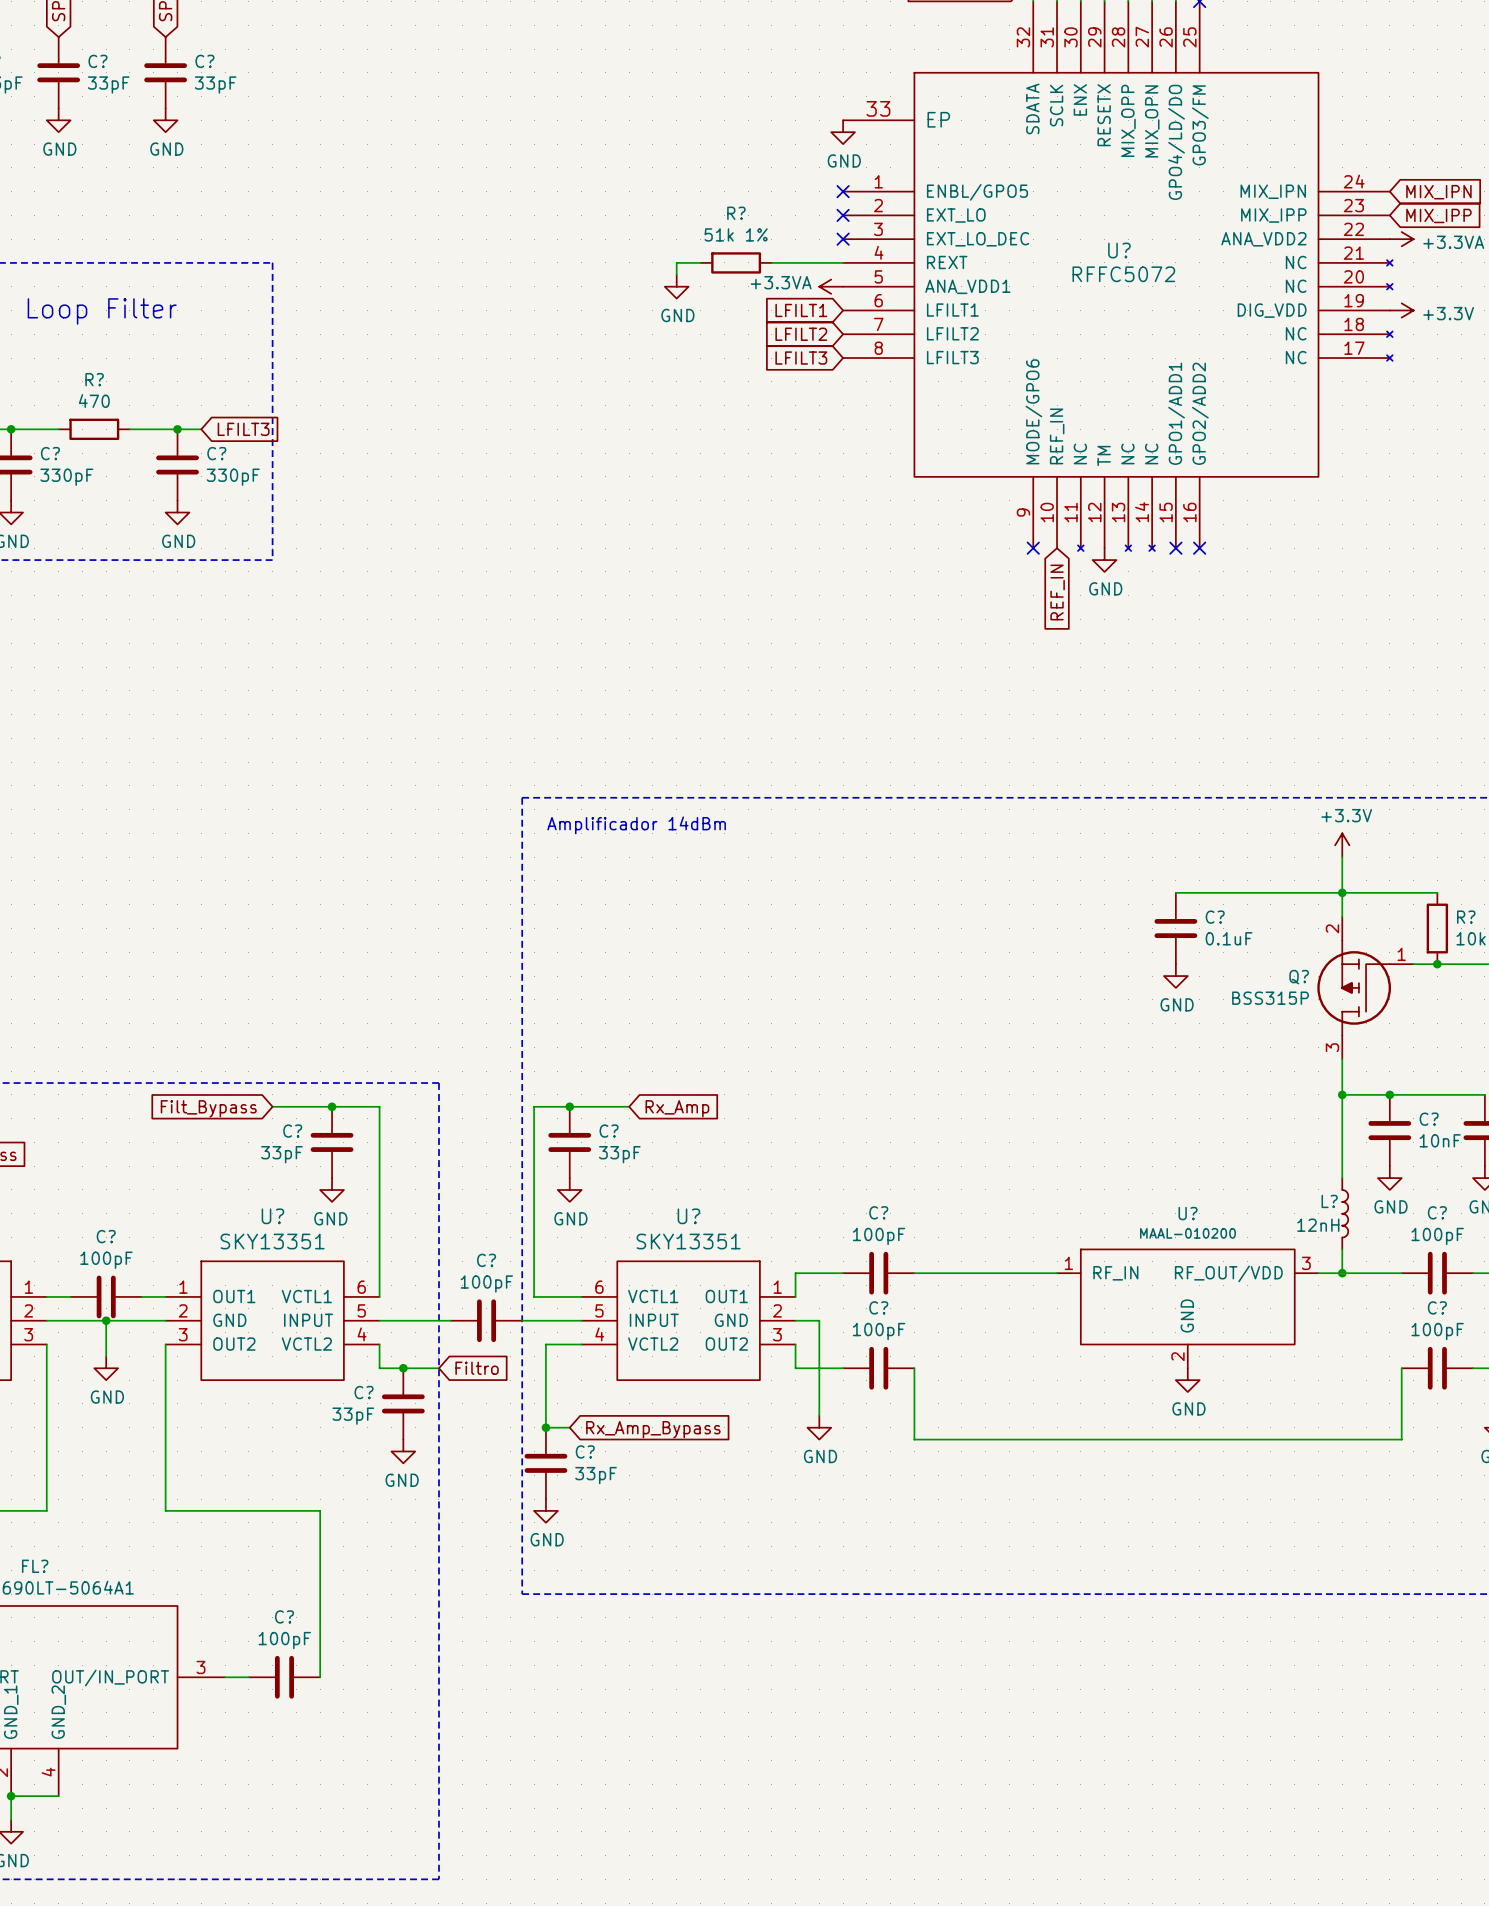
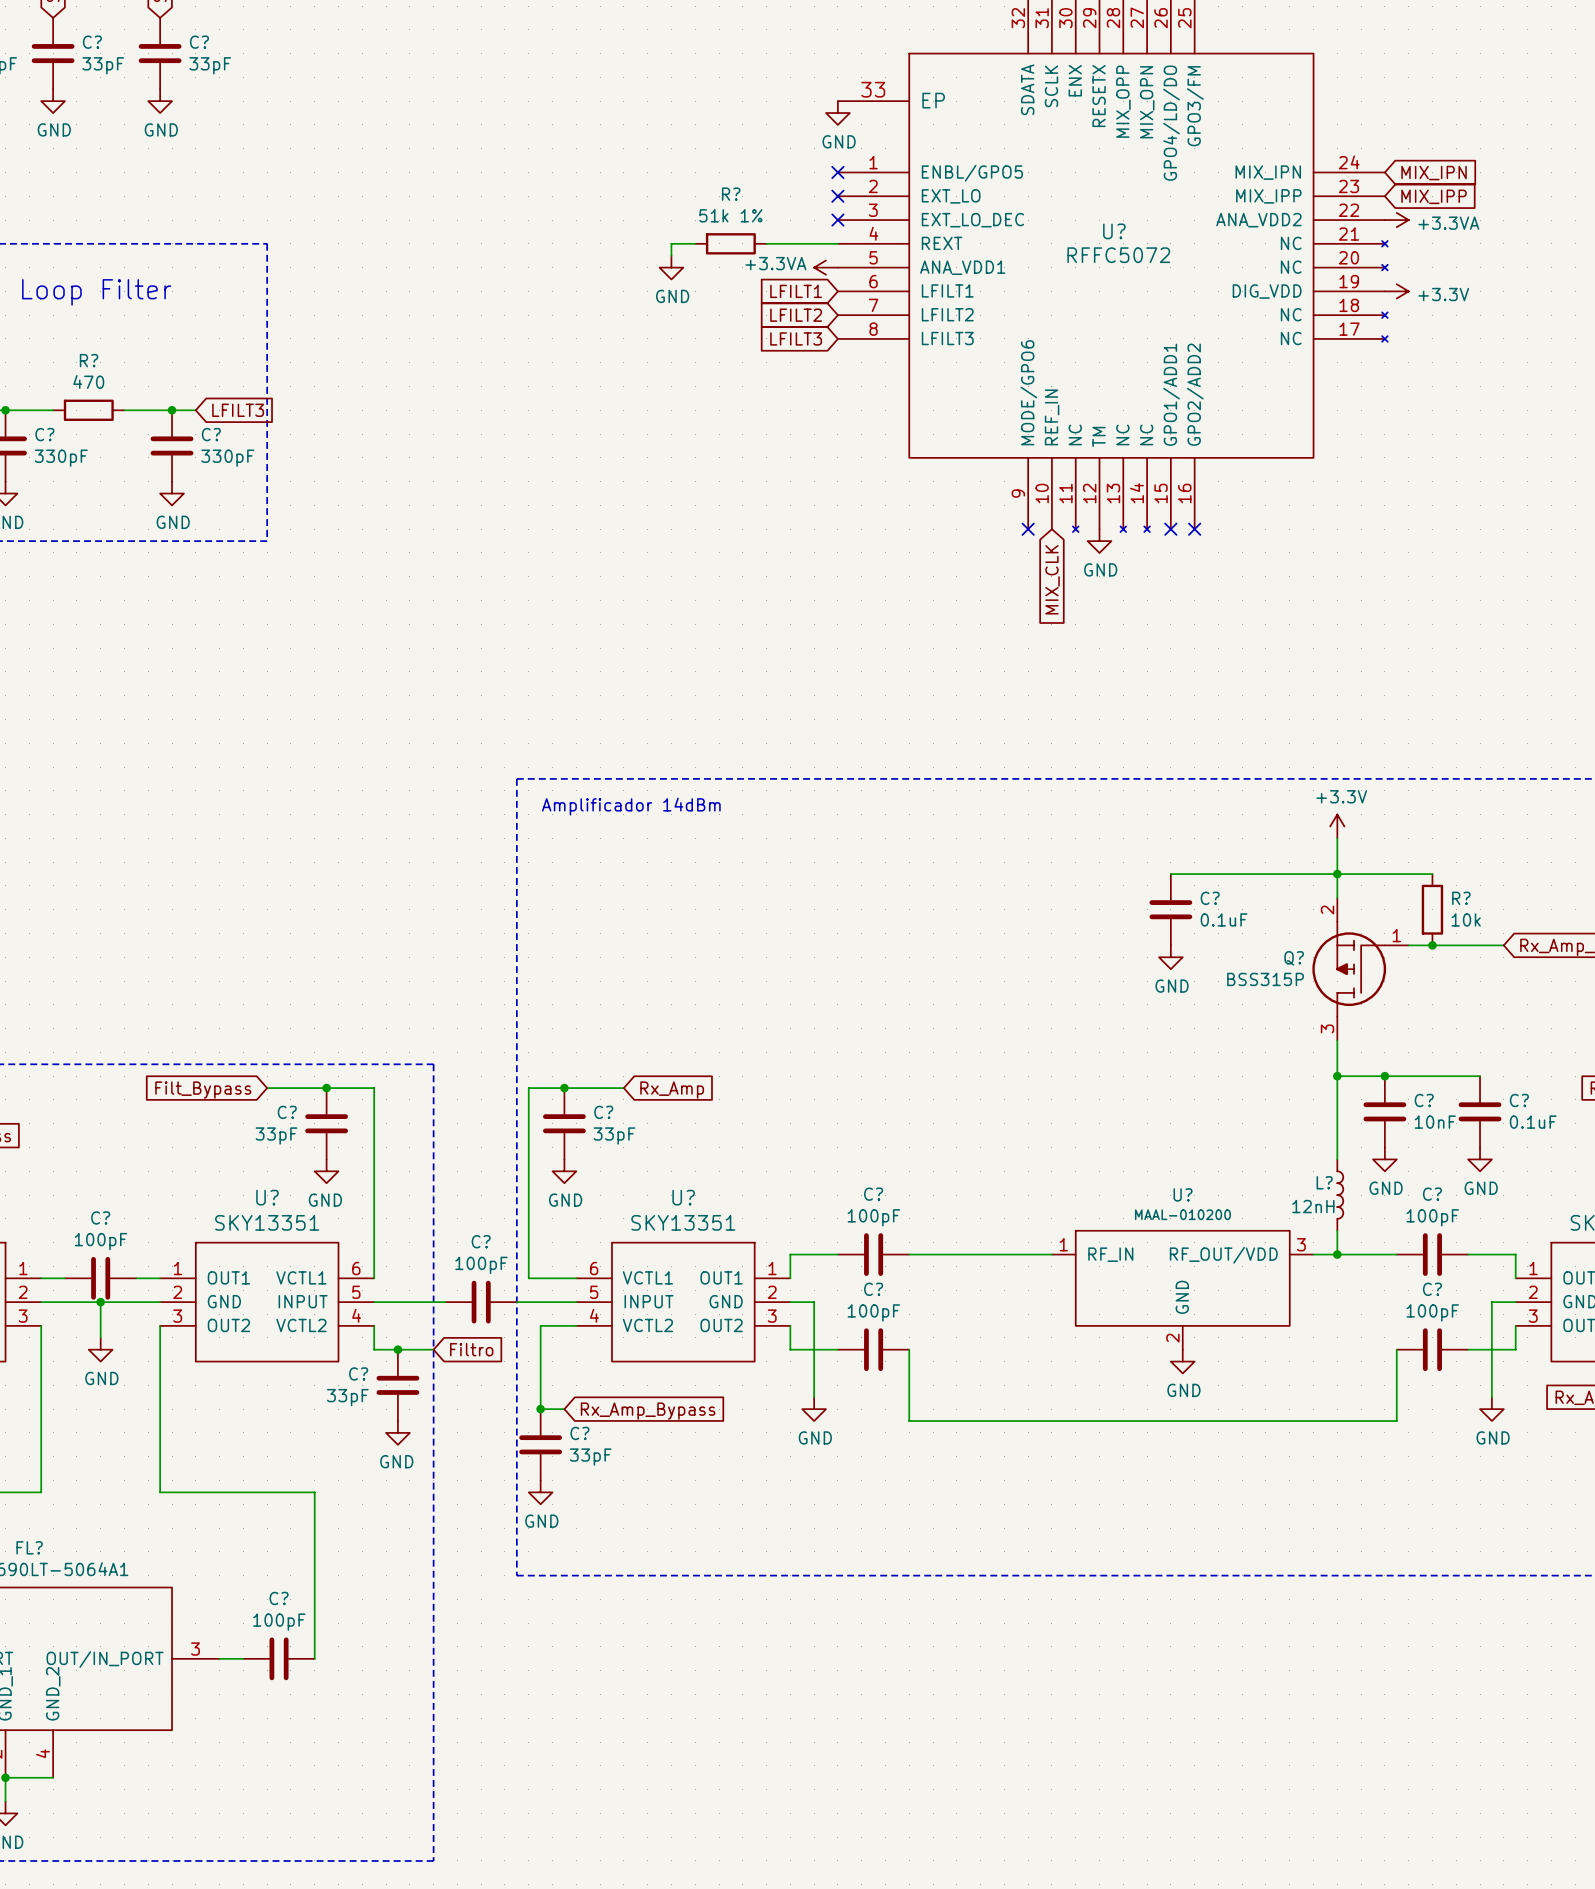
global label: REF_IN (1057, 592) -> MIX_CLK (1052, 579)

